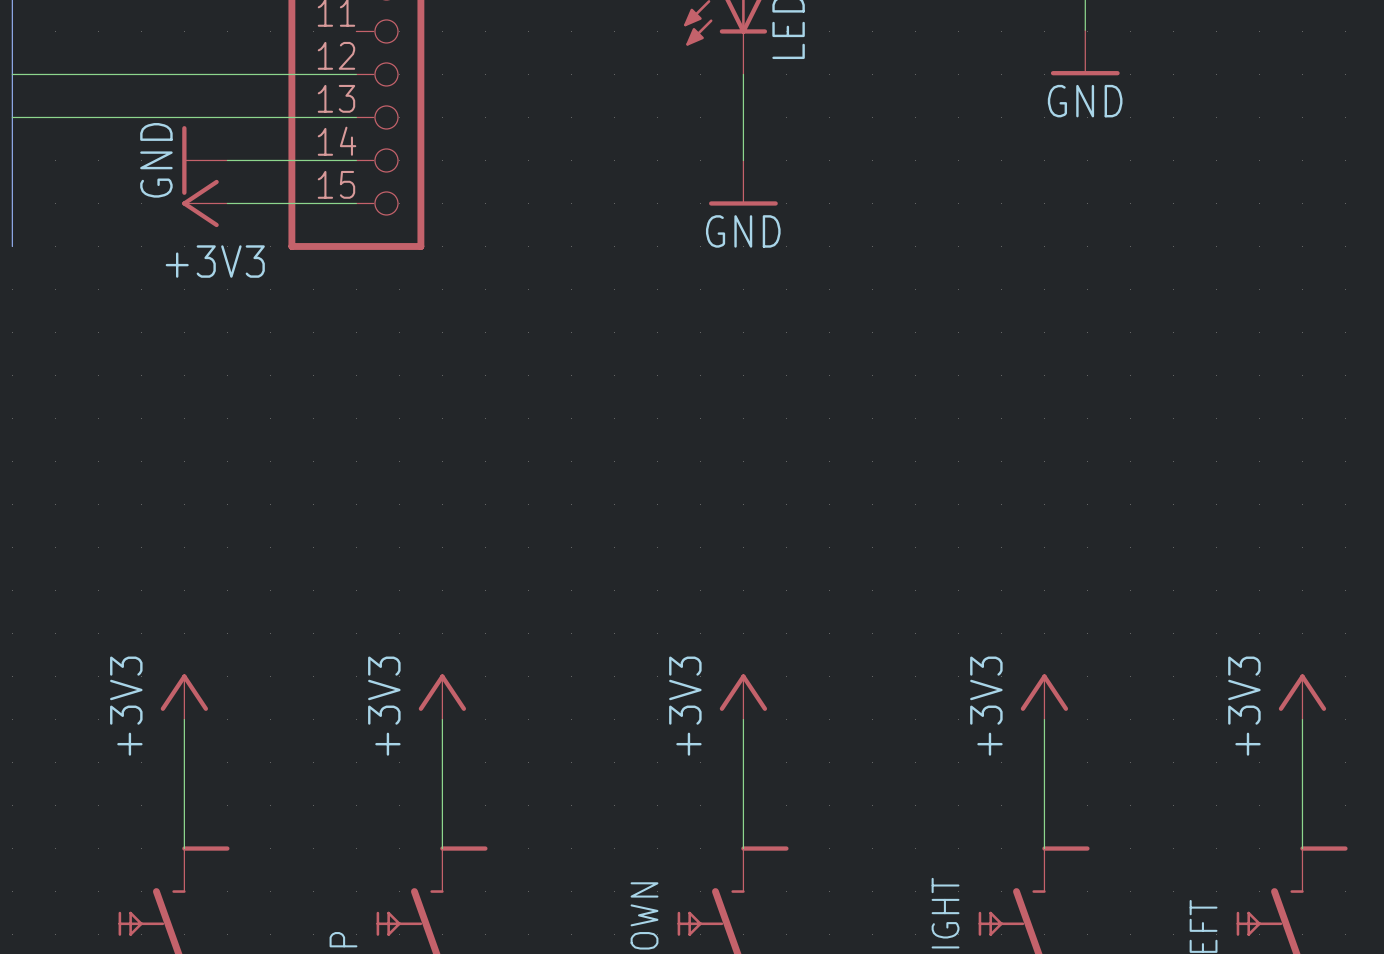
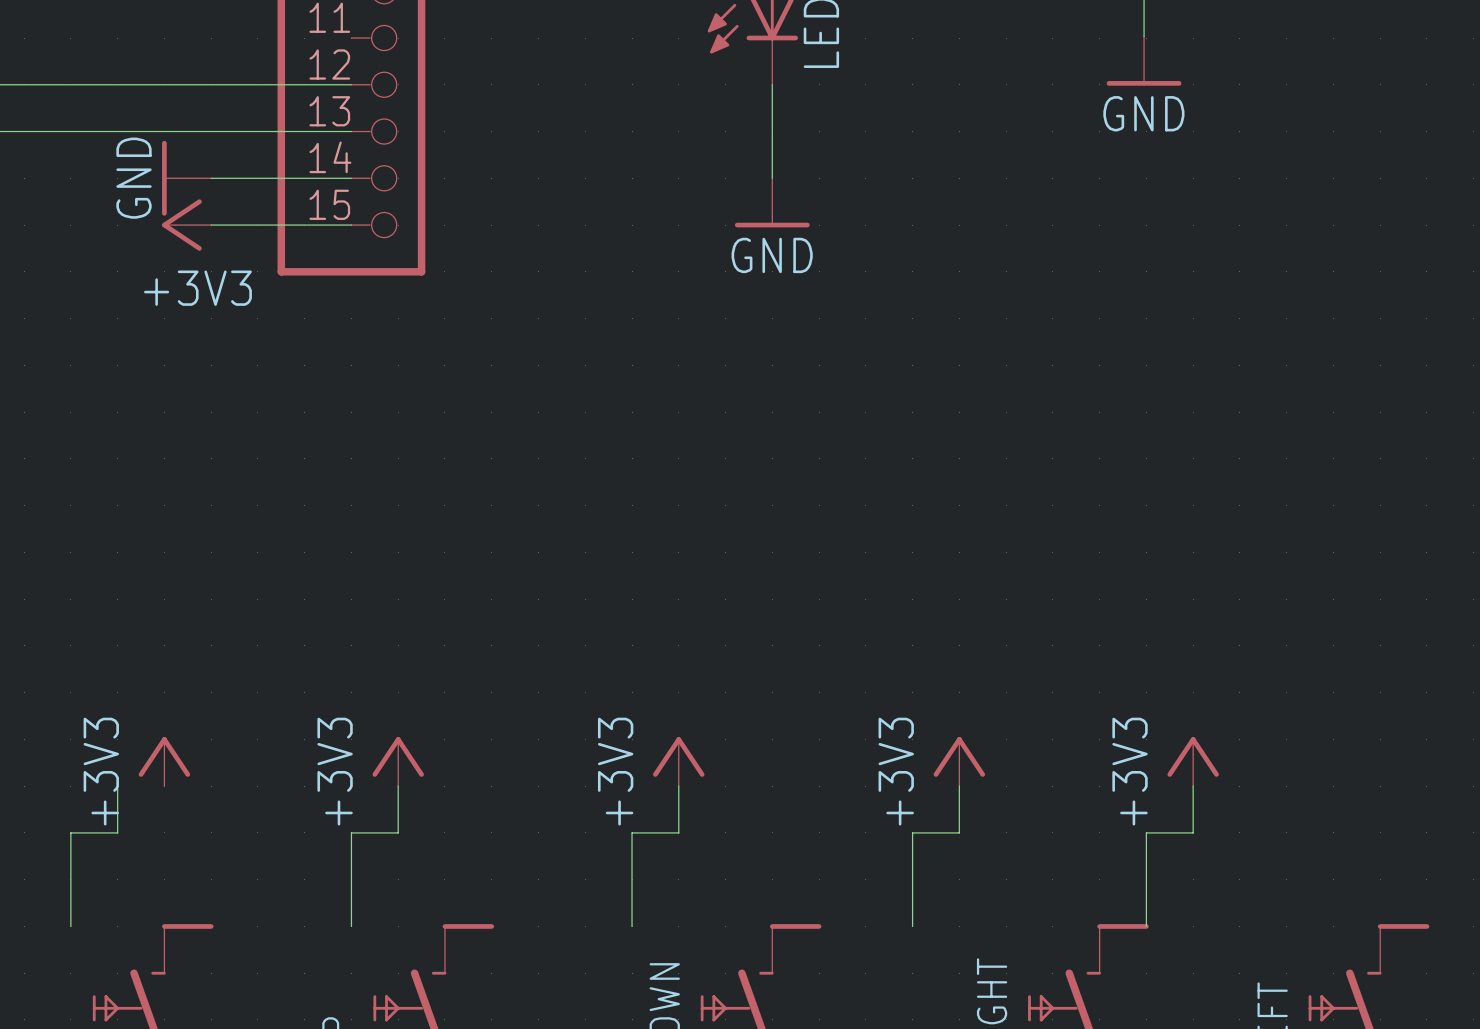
power symbol position: +3V3 (442, 696) -> +3V3 (398, 761)
power symbol: none -> +3V3 (678, 761)
power symbol: +3V3 (743, 696) -> none
power symbol: none -> +3V3 (959, 761)
power symbol: +3V3 (1044, 696) -> none
power symbol: none -> +3V3 (1193, 761)
power symbol: +3V3 (1302, 696) -> none
wire: none -> (117, 786) (117, 832) (70, 832) (70, 926)
wire: (184, 719) (184, 848) -> none
wire: none -> (398, 786) (398, 832) (351, 832) (351, 926)
wire: (442, 719) (442, 848) -> none
wire: none -> (678, 786) (678, 832) (632, 832) (632, 926)
wire: (743, 719) (743, 848) -> none
wire: none -> (959, 786) (959, 832) (912, 832) (912, 926)
wire: (1044, 719) (1044, 848) -> none
wire: none -> (1193, 786) (1193, 832) (1146, 832) (1146, 926)
wire: (1302, 719) (1302, 848) -> none

